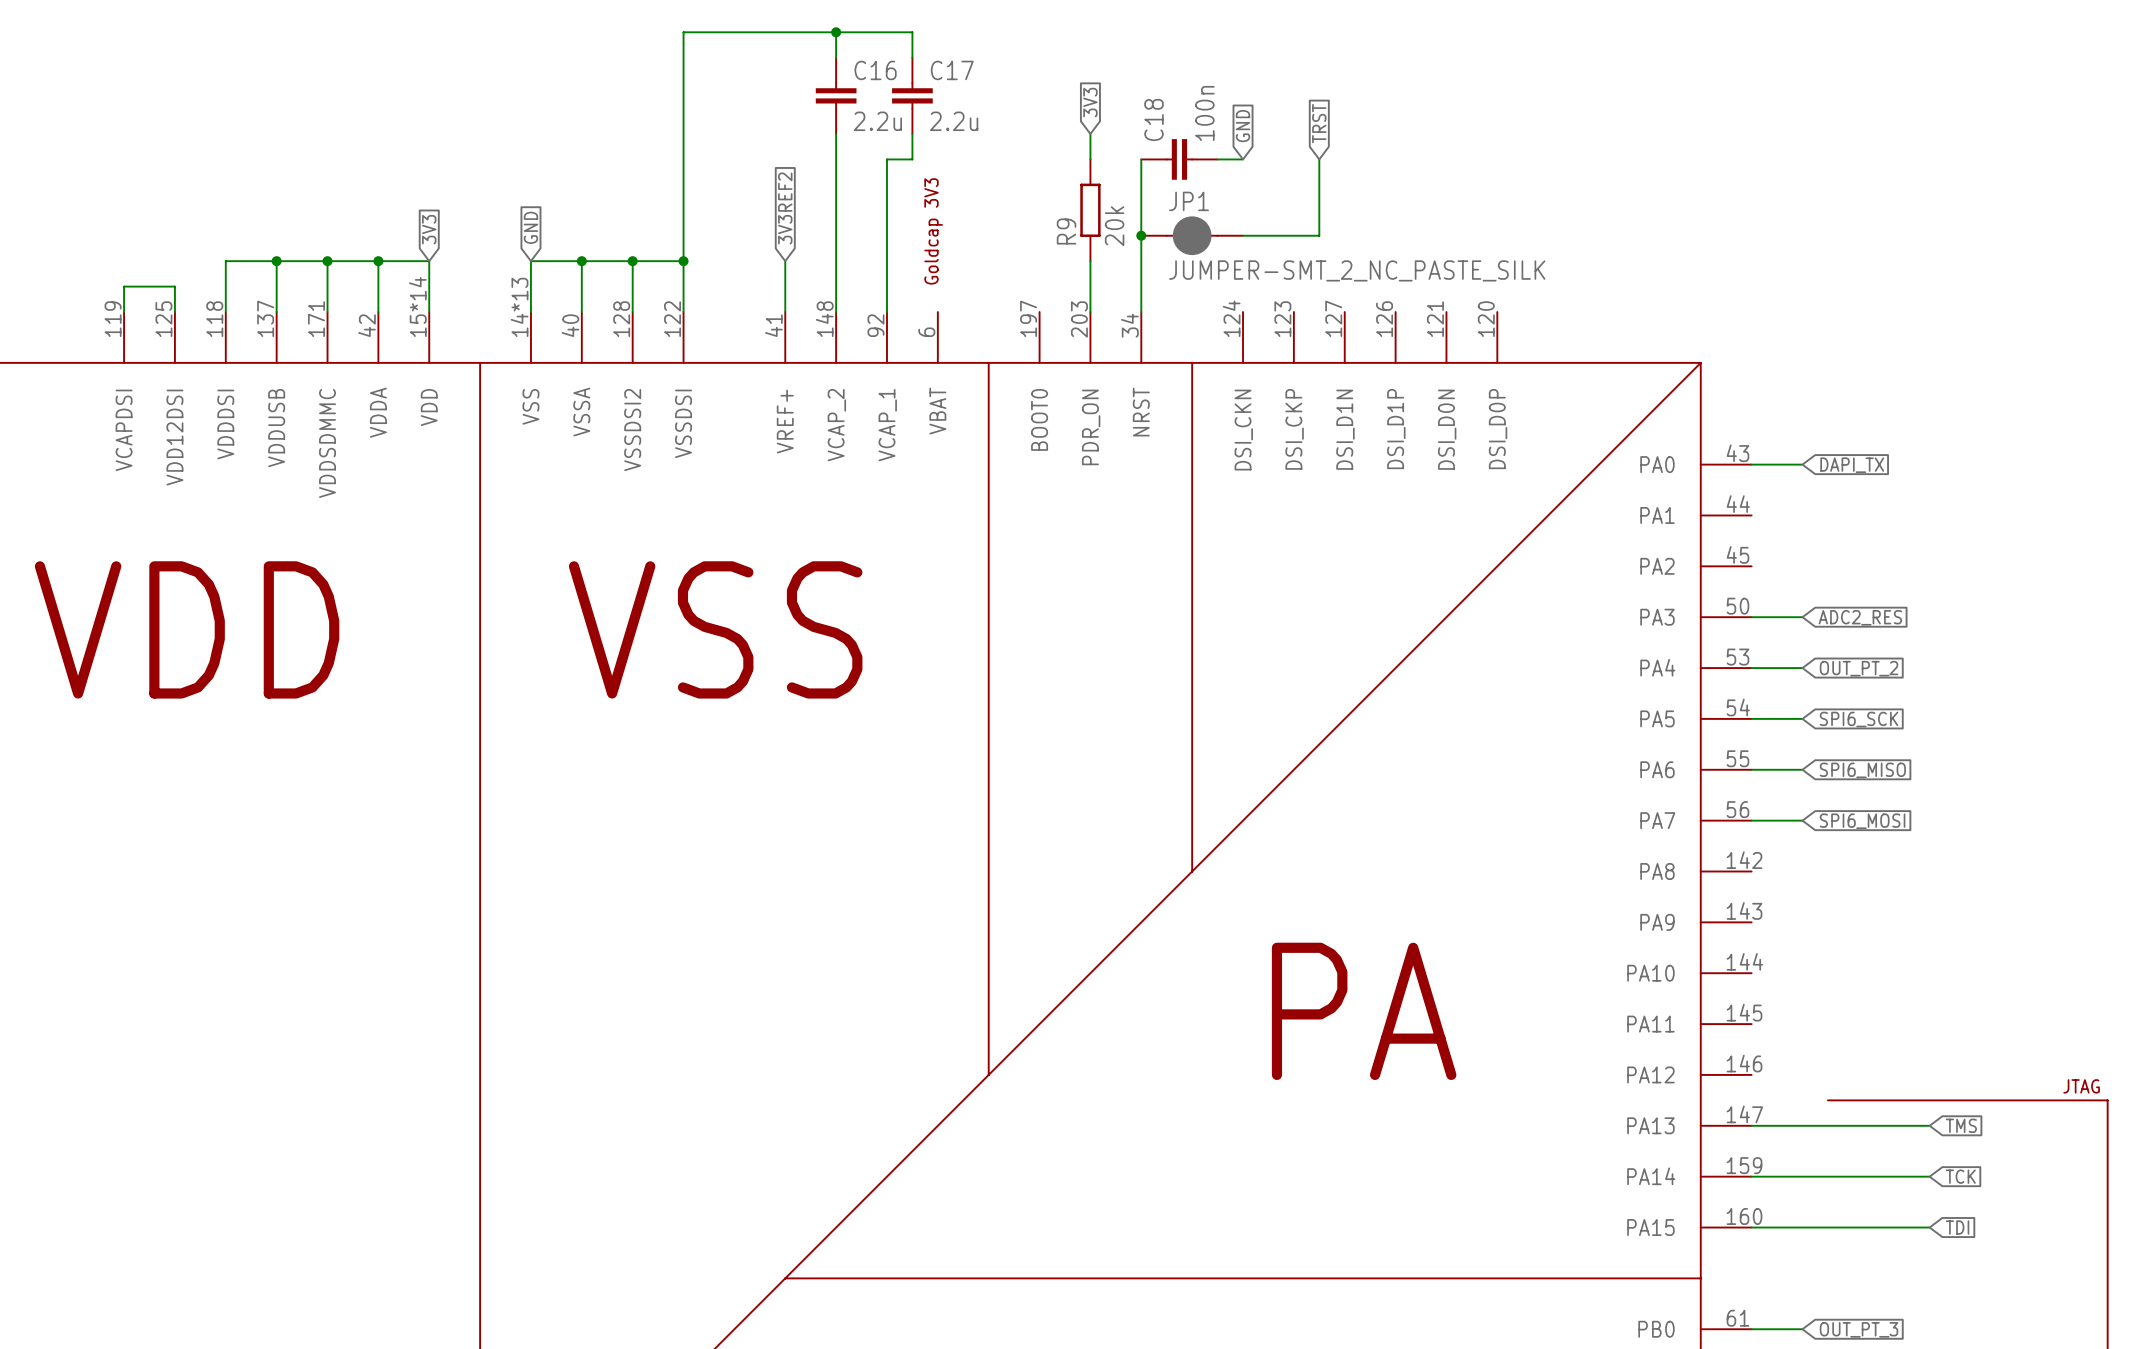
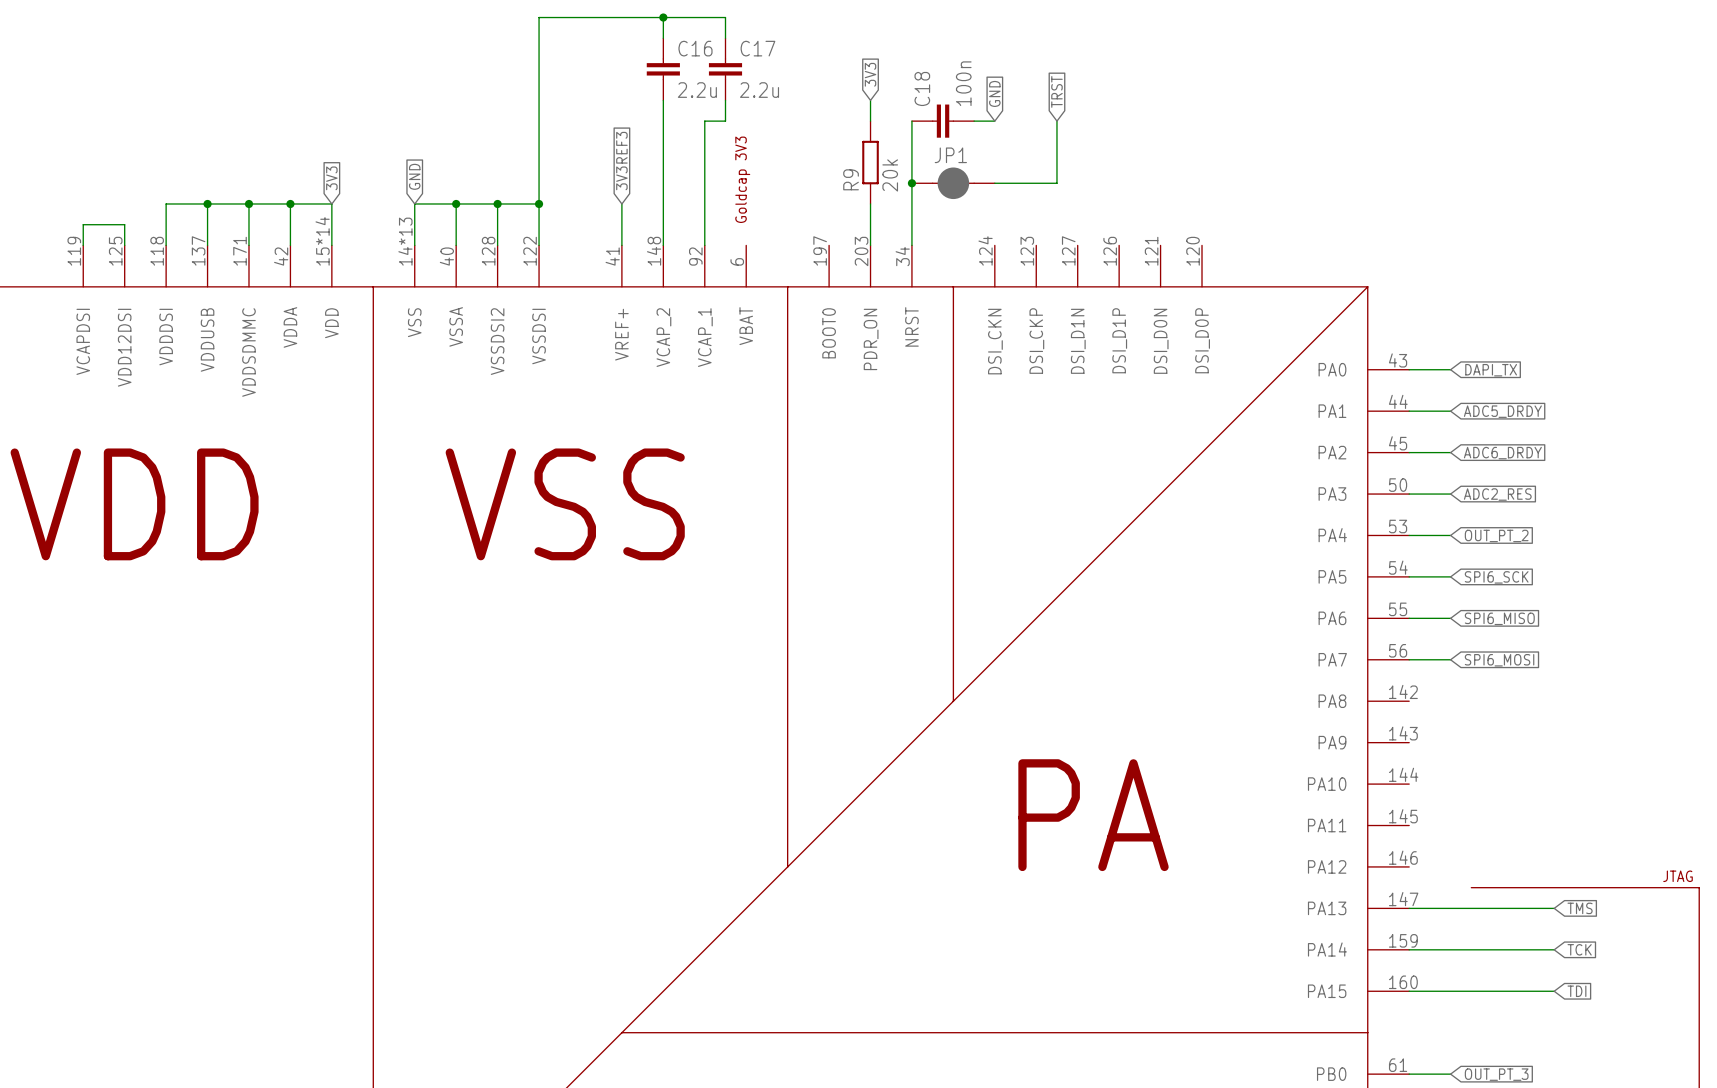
global label: 3V3REF2 (785, 208) -> 3V3REF3 (621, 161)
JP1 value: JUMPER-SMT_2_NC_PASTE_SILK (1357, 270) -> none
wire: none -> (1409, 411) (1450, 411)
global label: none -> ADC5_DRDY (1502, 411)
wire: none -> (1409, 452) (1450, 452)
global label: none -> ADC6_DRDY (1502, 453)

